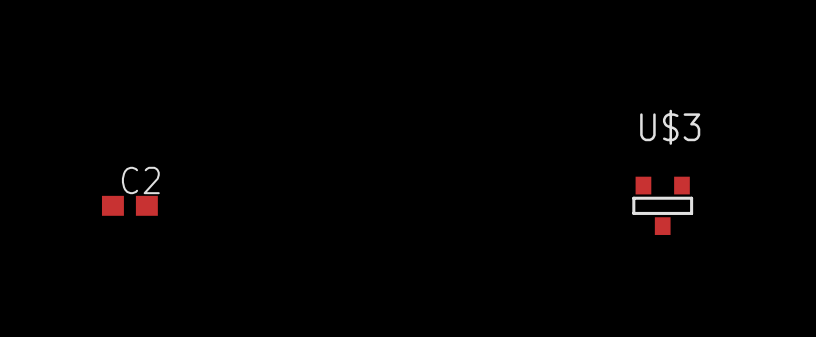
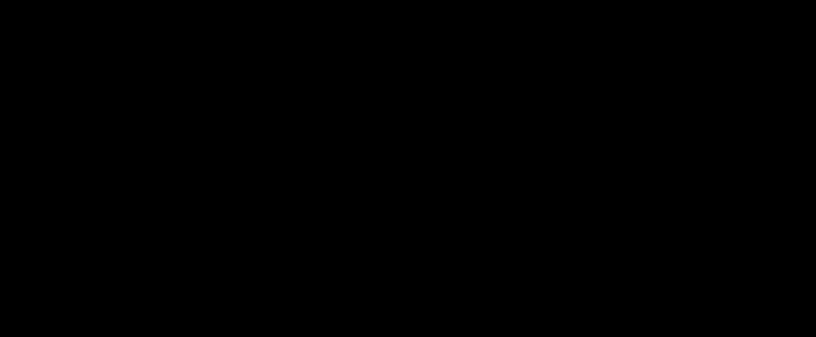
C2: (129, 205) -> none
U$3: (662, 205) -> none

